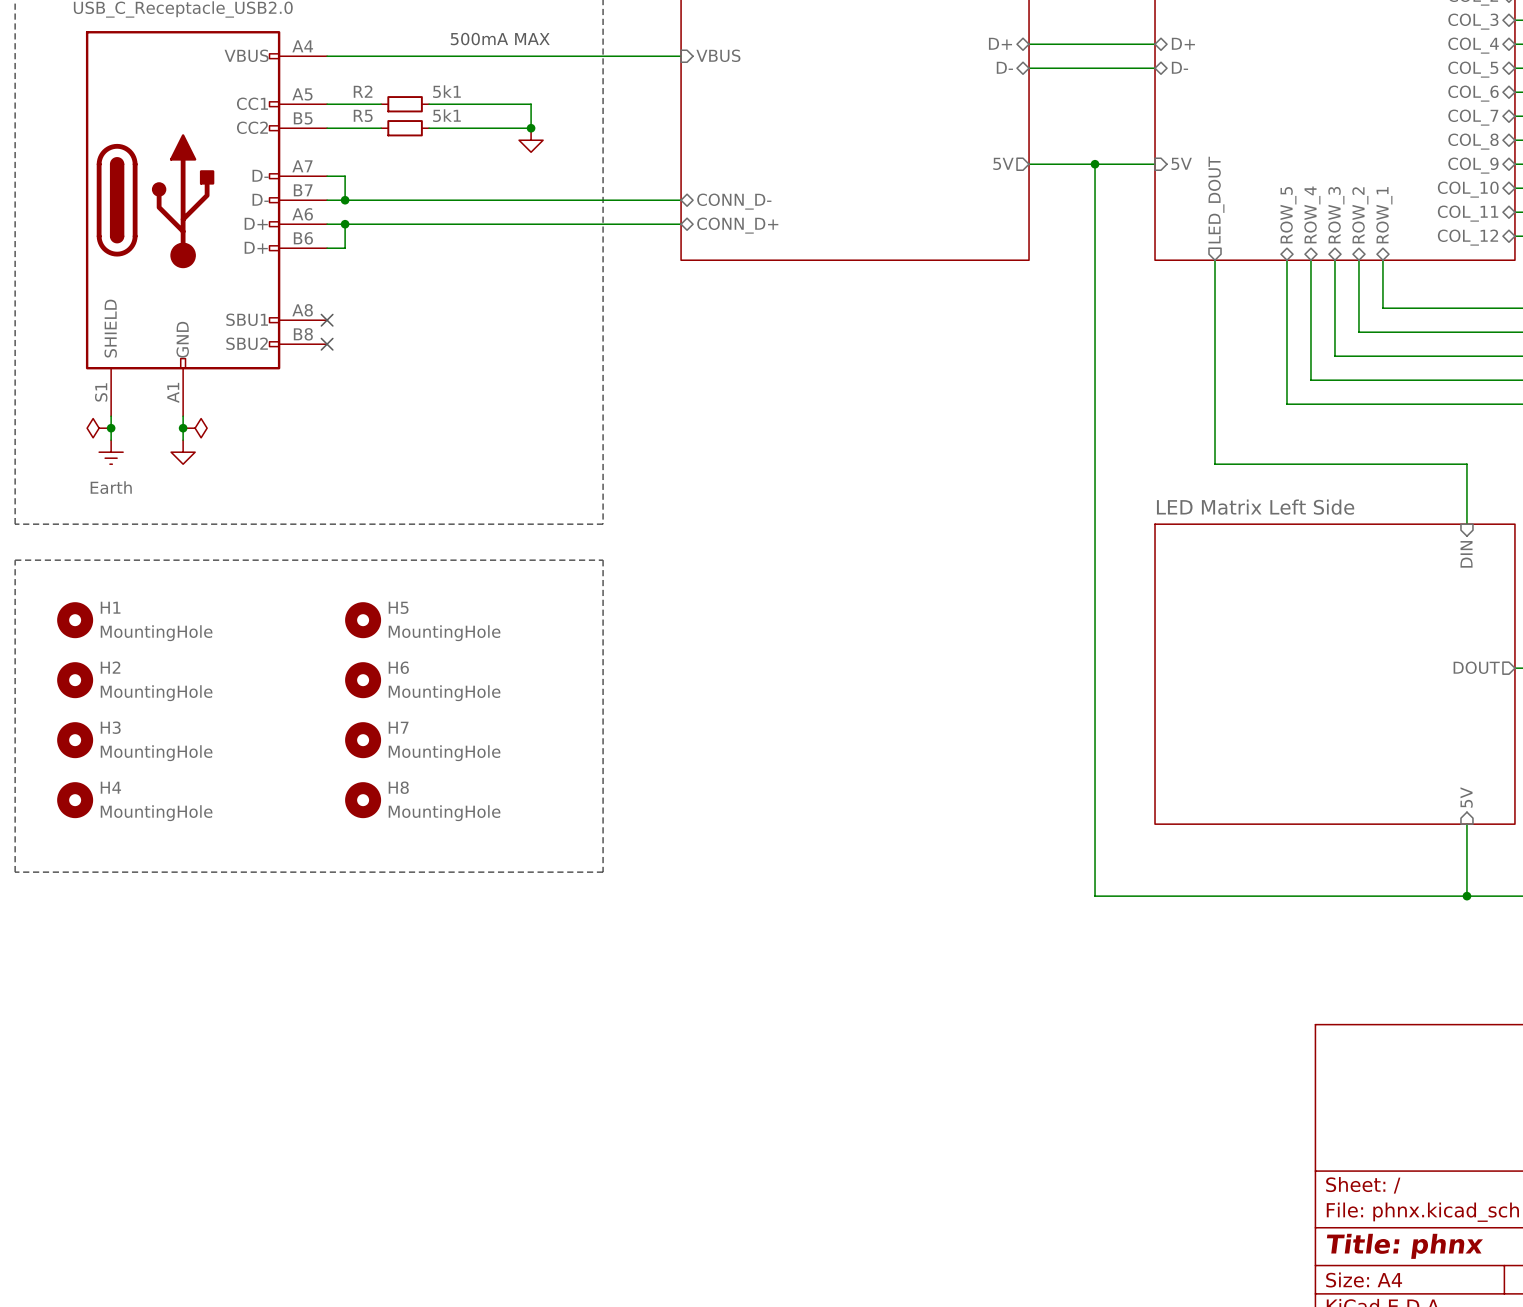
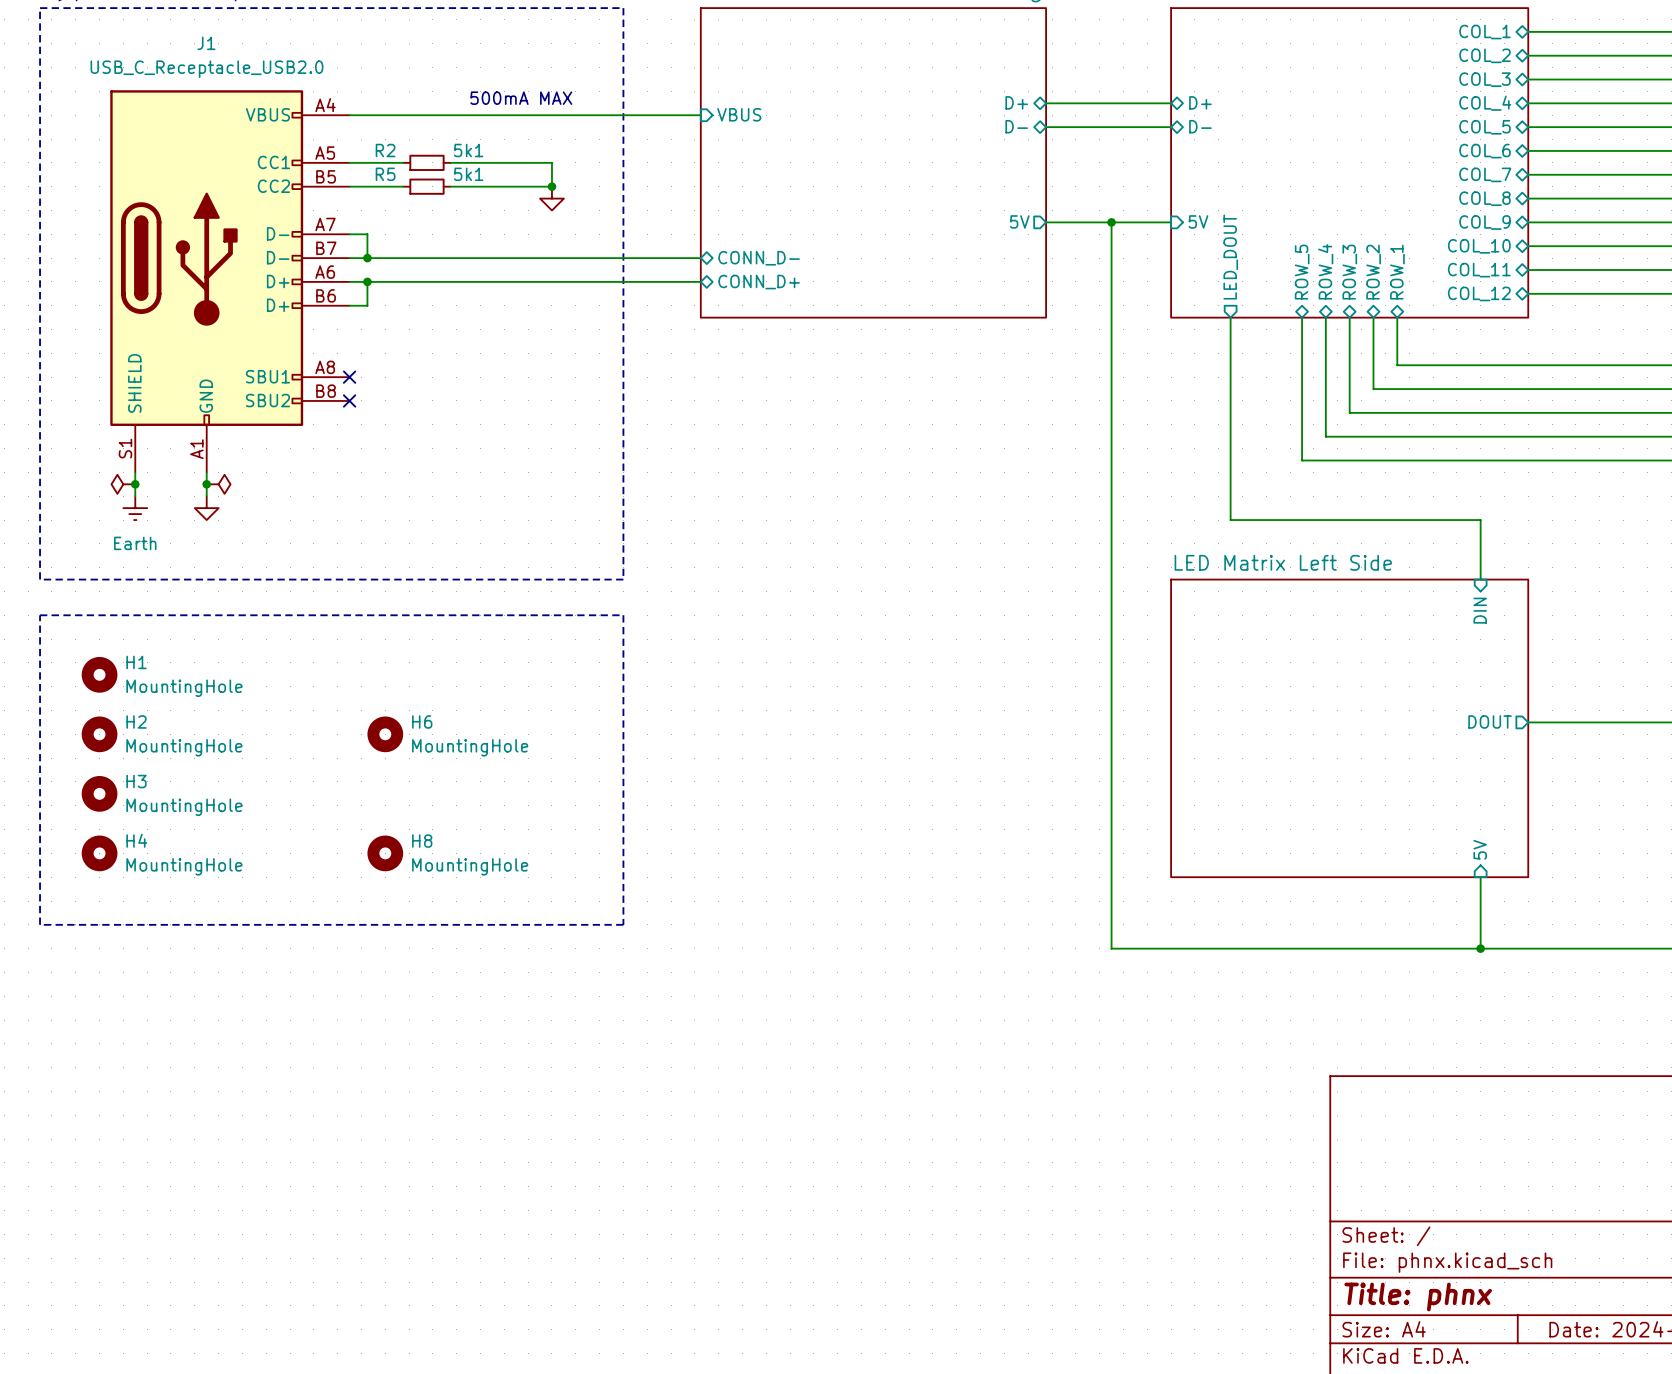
H5: MountingHole (363, 620) -> none
H7: MountingHole (363, 740) -> none

